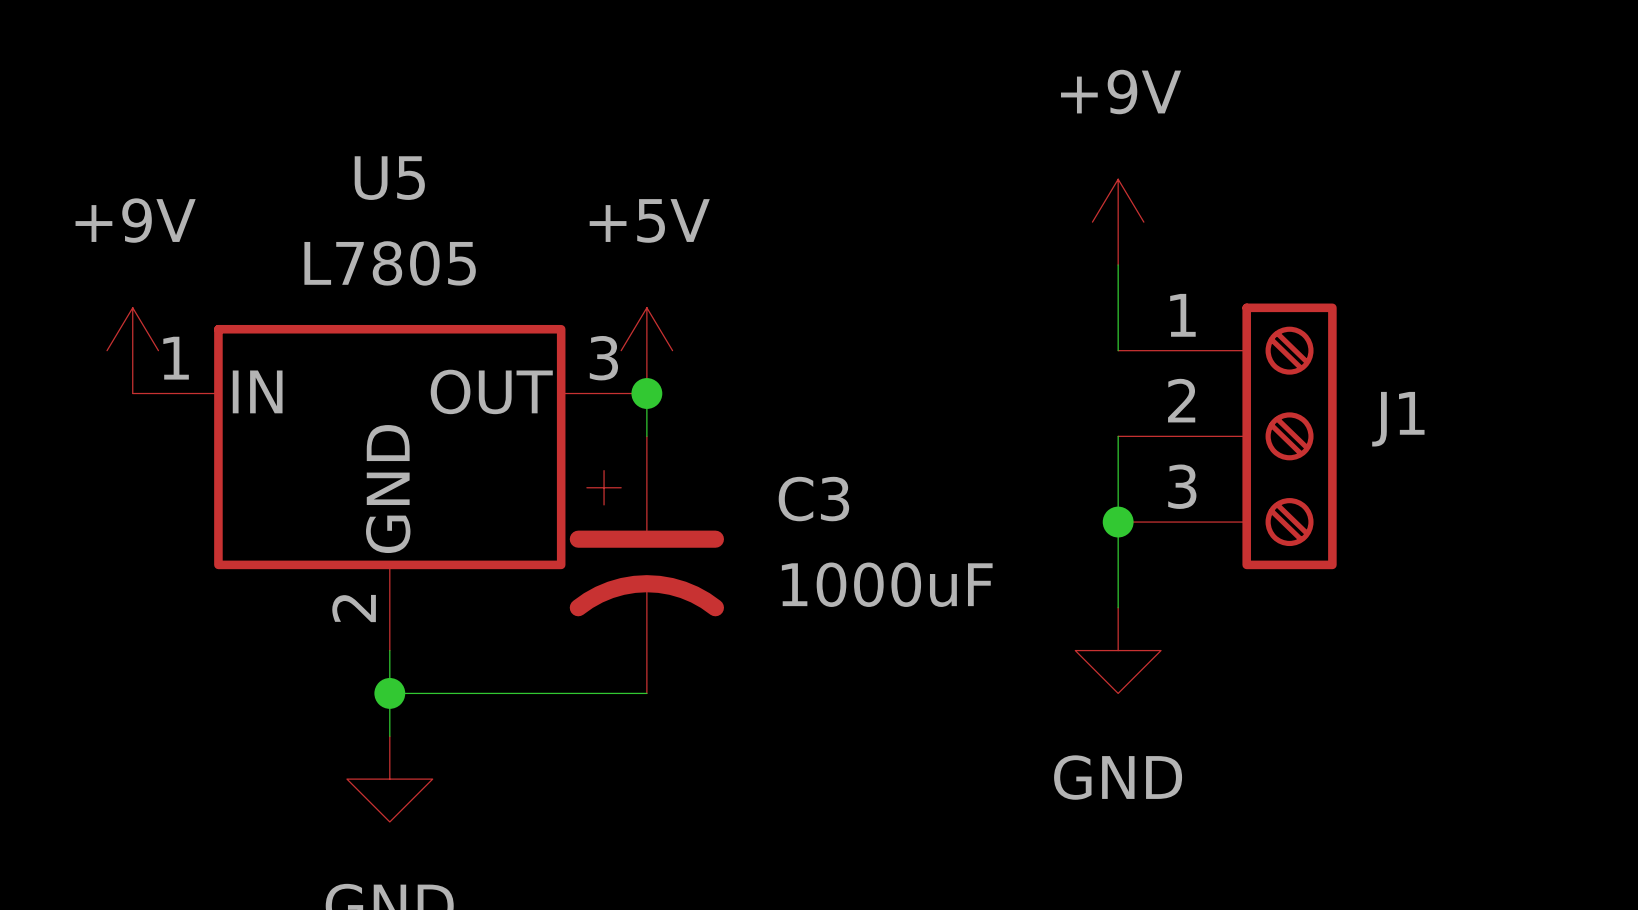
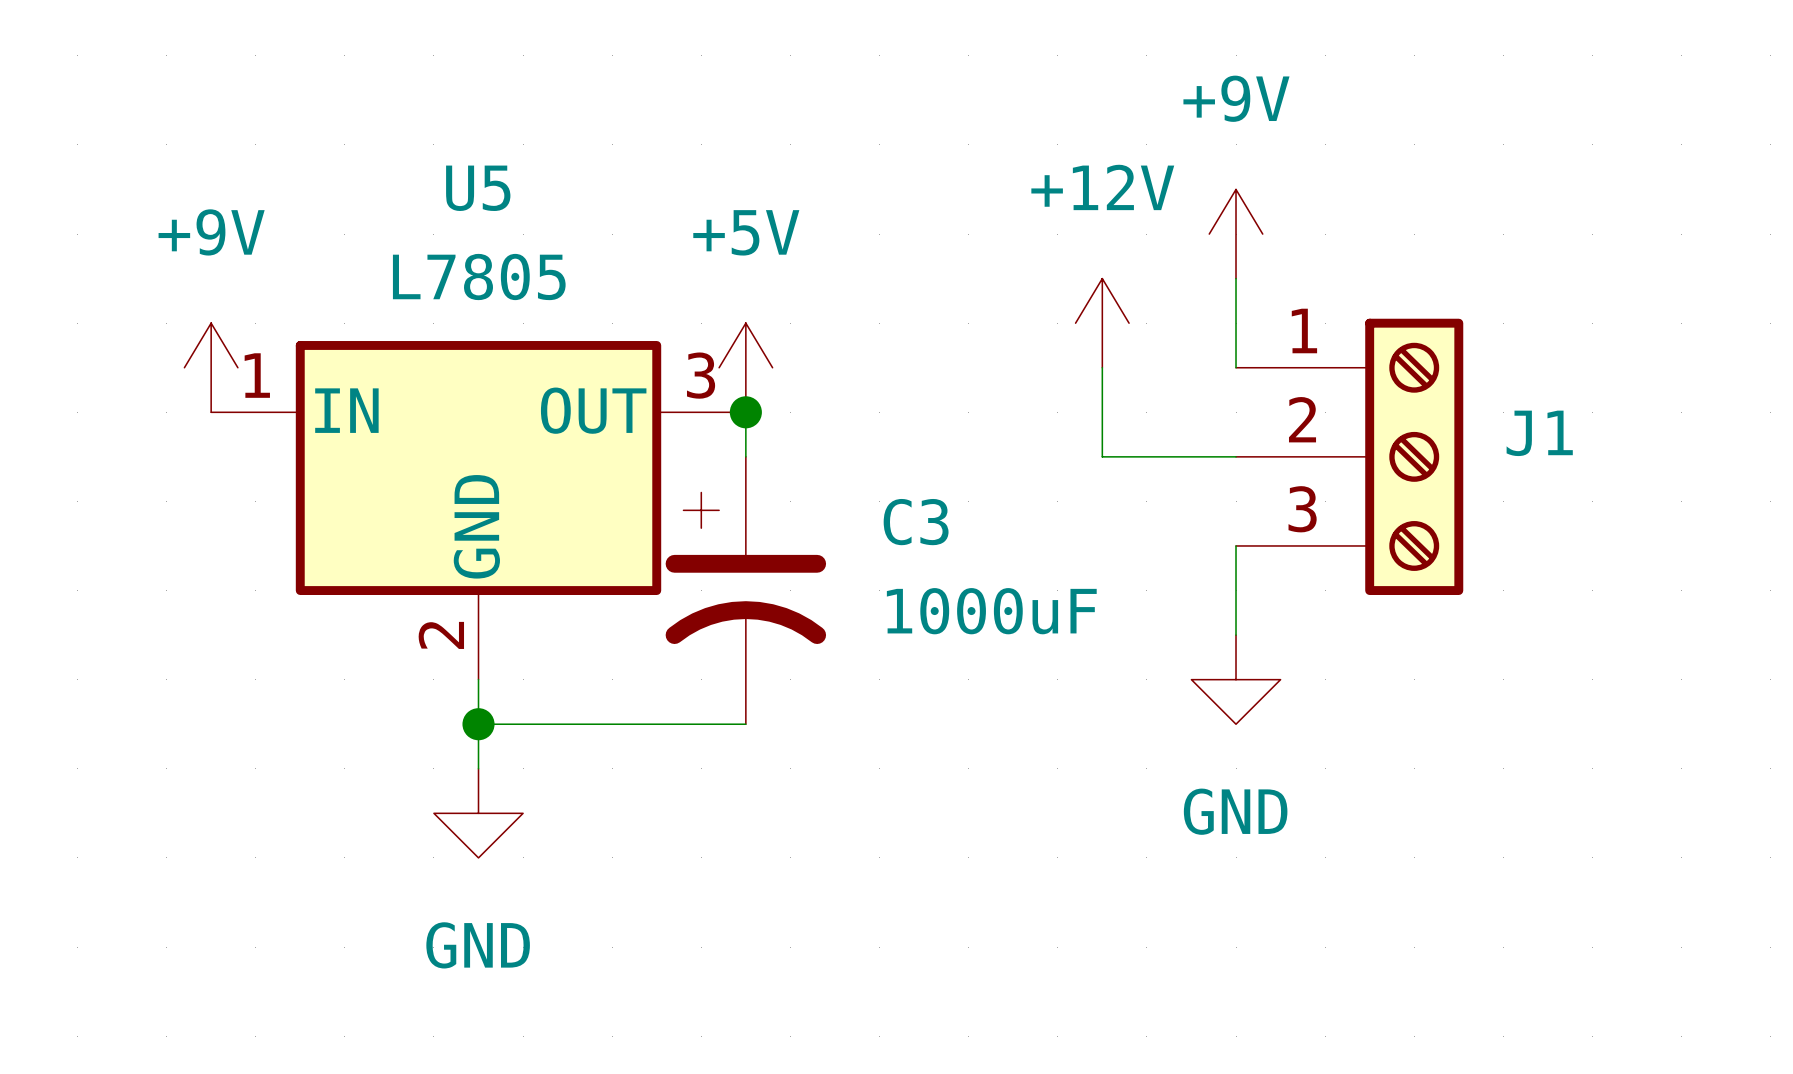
power symbol: none -> +12V (1102, 323)
wire: (1118, 436) (1118, 522) -> (1236, 456) (1102, 456) (1102, 367)
junction: (1118, 522) -> none

